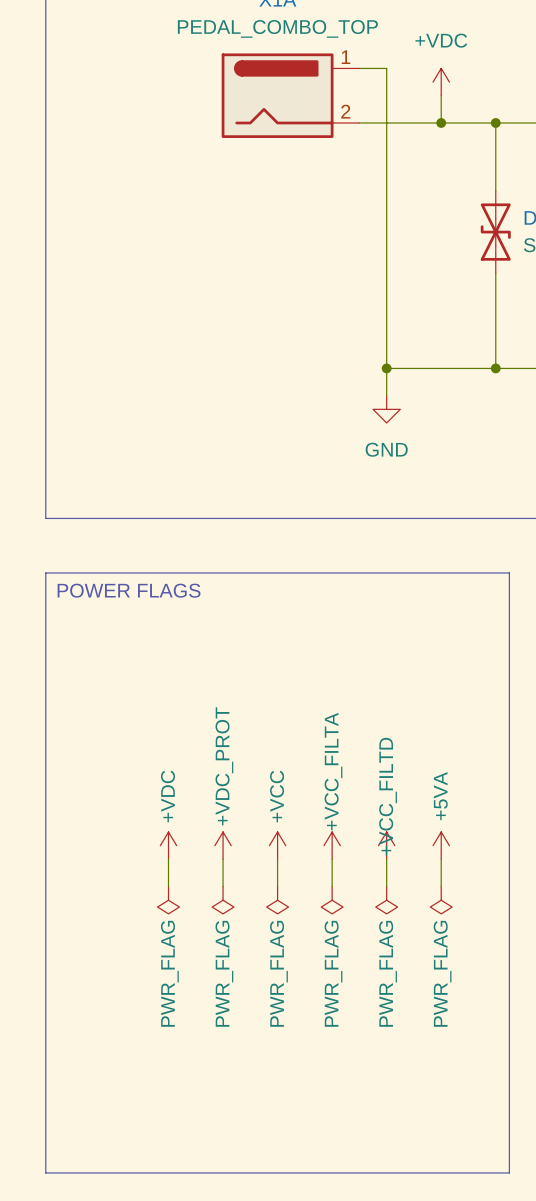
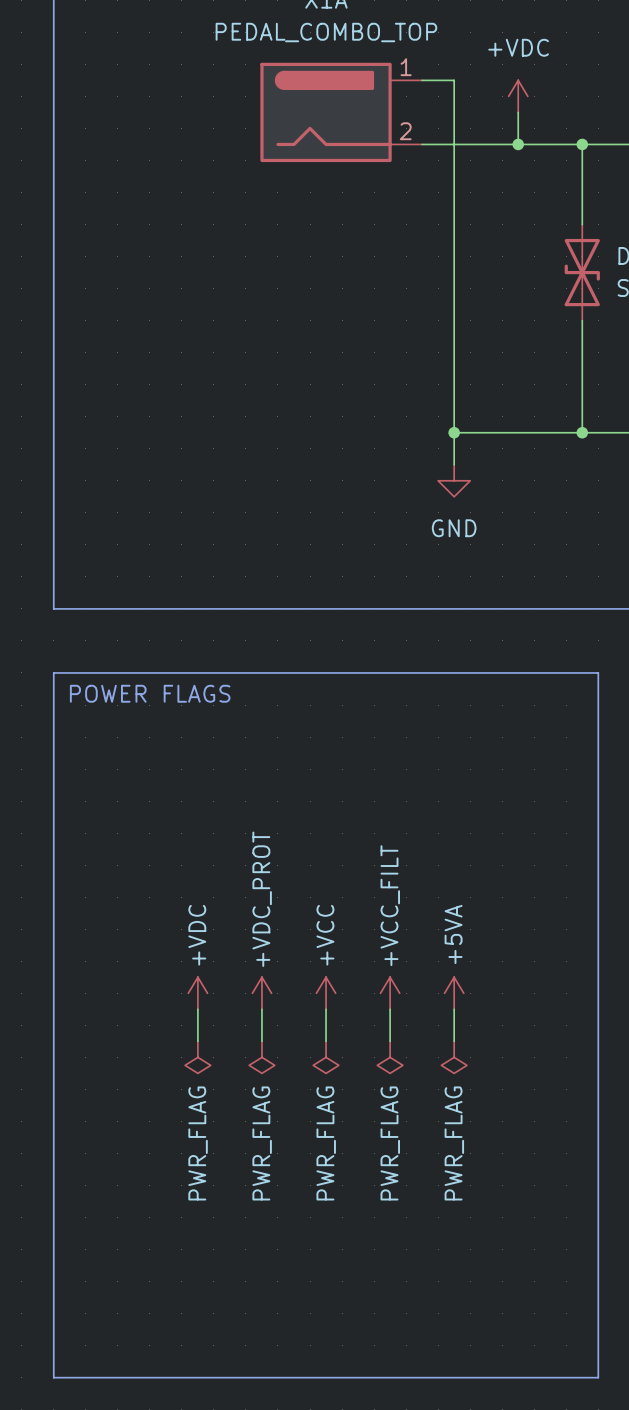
power symbol: +VCC_FILTA (332, 845) -> +VCC_FILT (390, 993)
power symbol: +VCC_FILTD (386, 845) -> +5VA (454, 993)
power symbol: +5VA (441, 845) -> none
wire: (441, 859) (441, 886) -> none
power symbol: PWR_FLAG (441, 900) -> none

